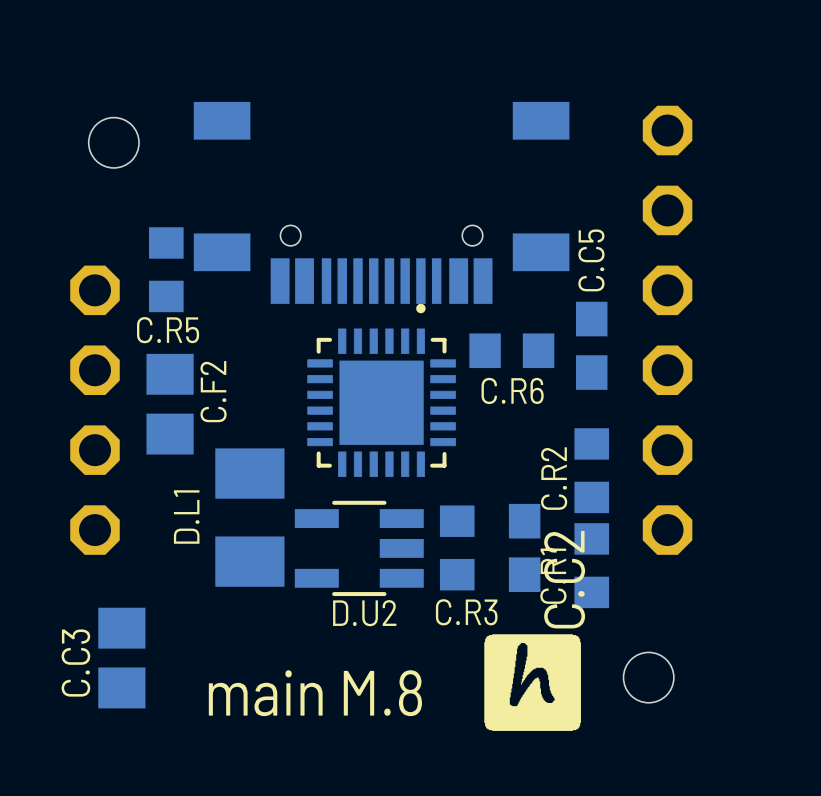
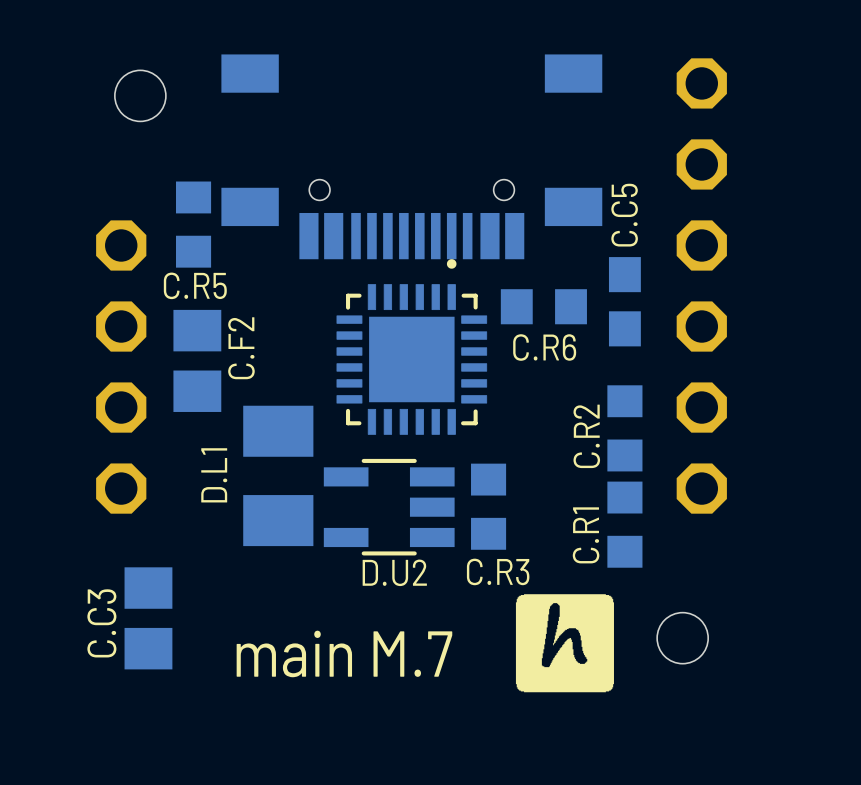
C.C2: (524, 547) -> none
text: main M.8 (315, 693) -> main M.7 (344, 653)

